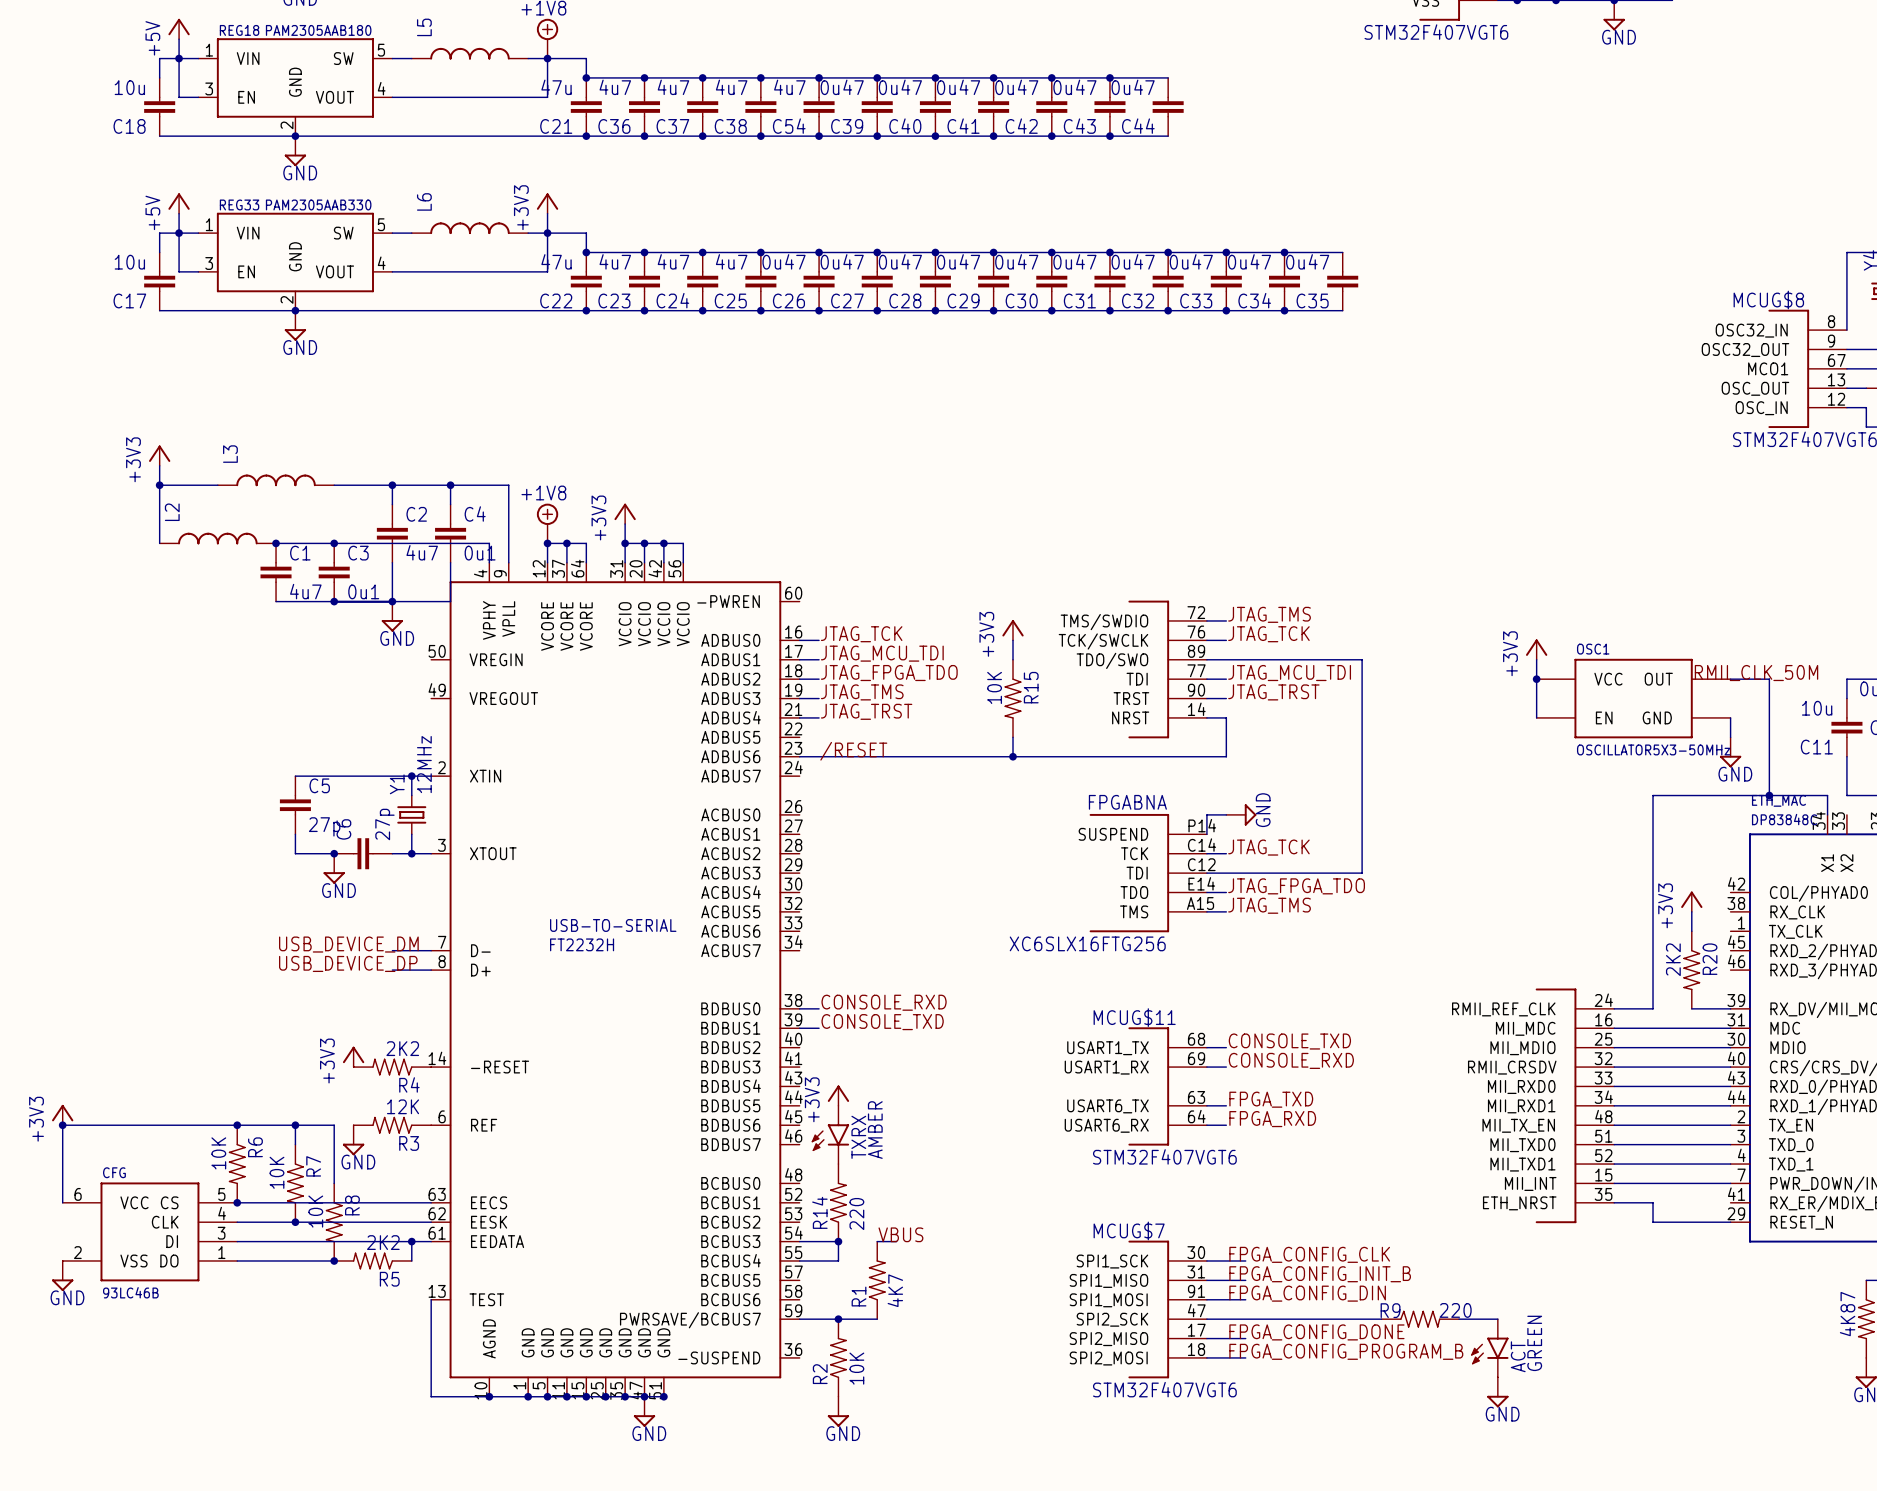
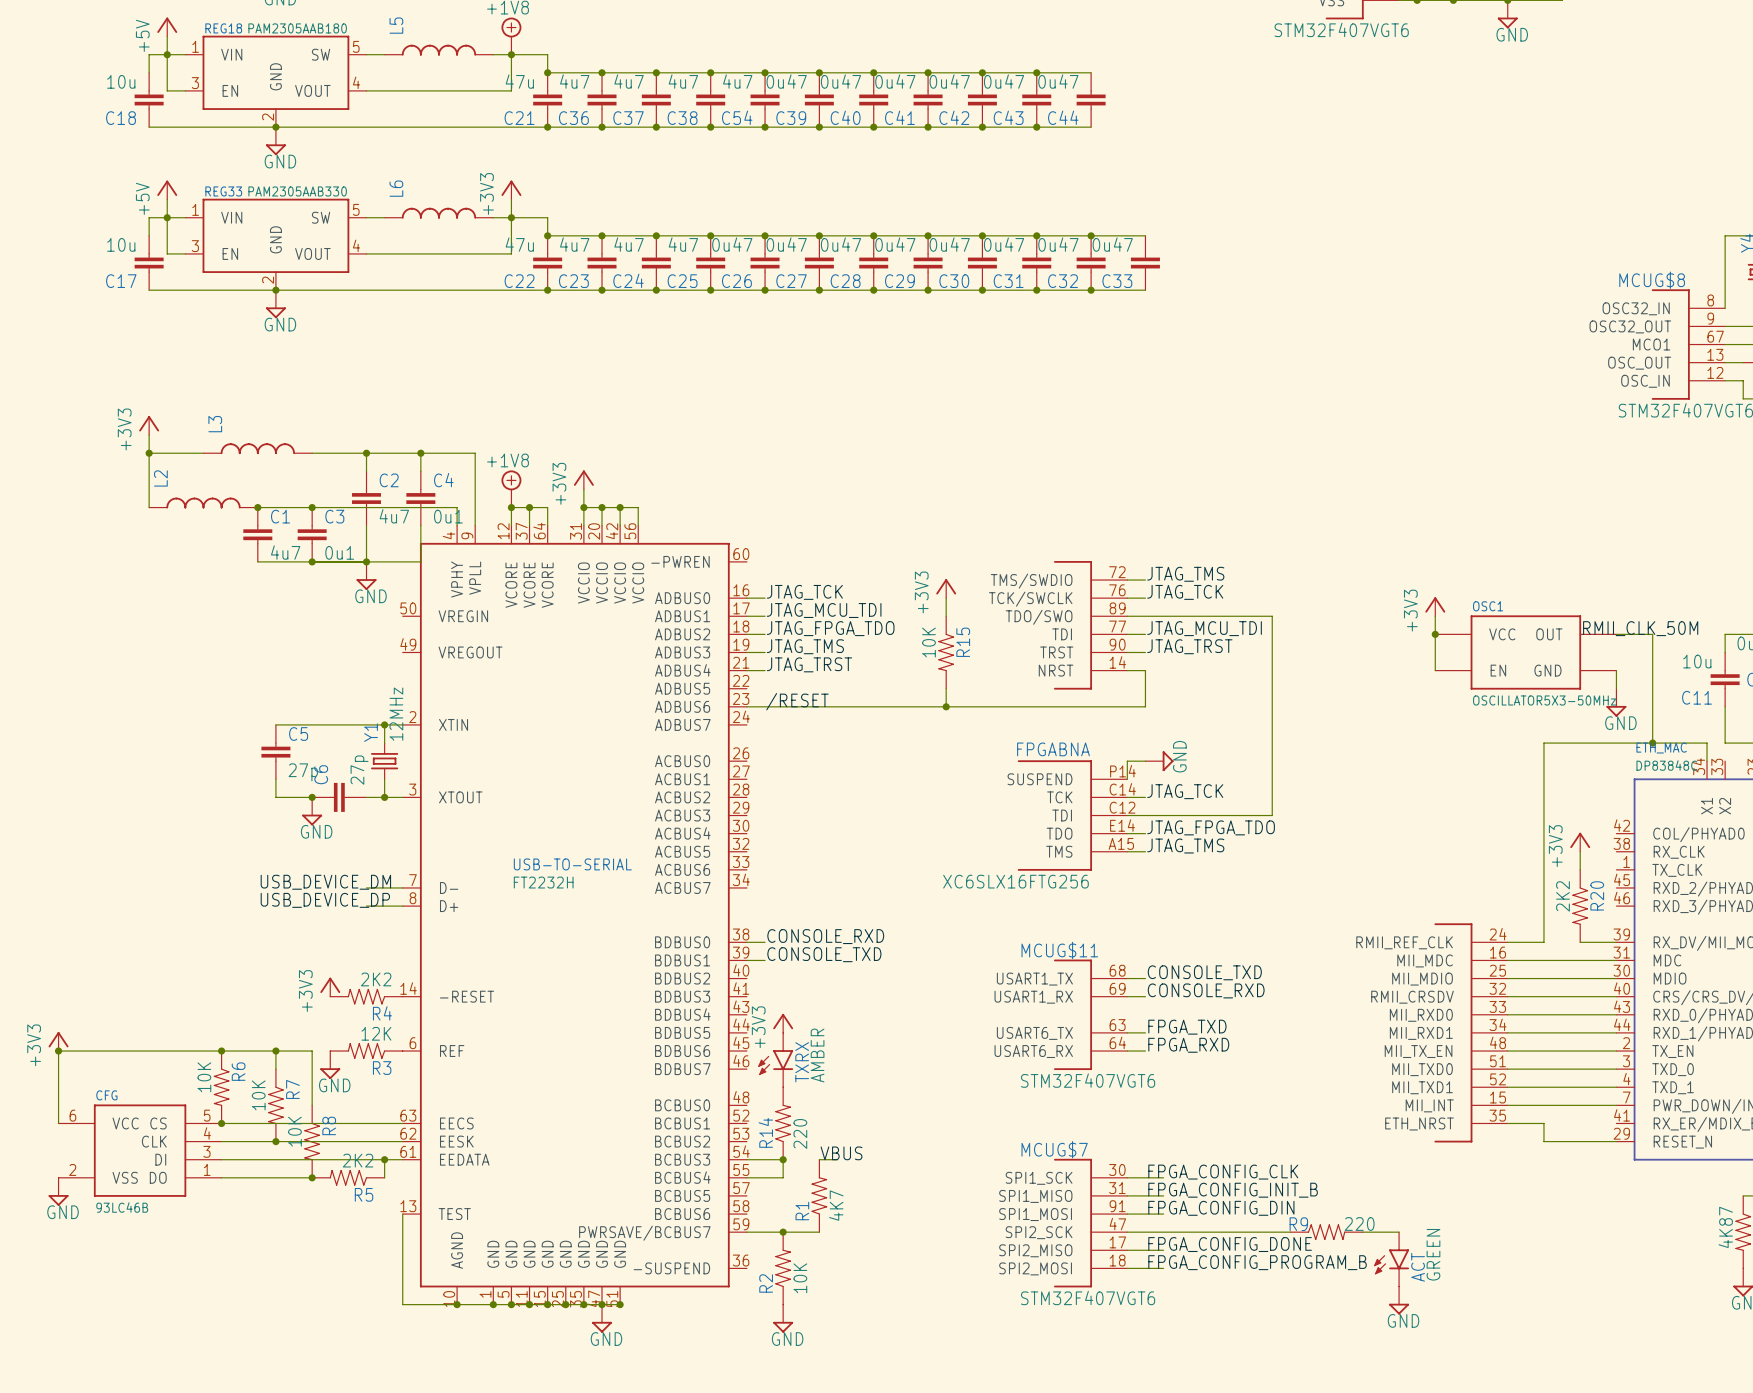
wire: (1226, 252) (1342, 252) -> none
junction: (1226, 252) -> none
junction: (1284, 252) -> none
C34: 0u47 (1284, 281) -> none
C35: 0u47 (1342, 281) -> none
wire: (1226, 310) (1342, 310) -> none
junction: (1226, 310) -> none
junction: (1284, 310) -> none

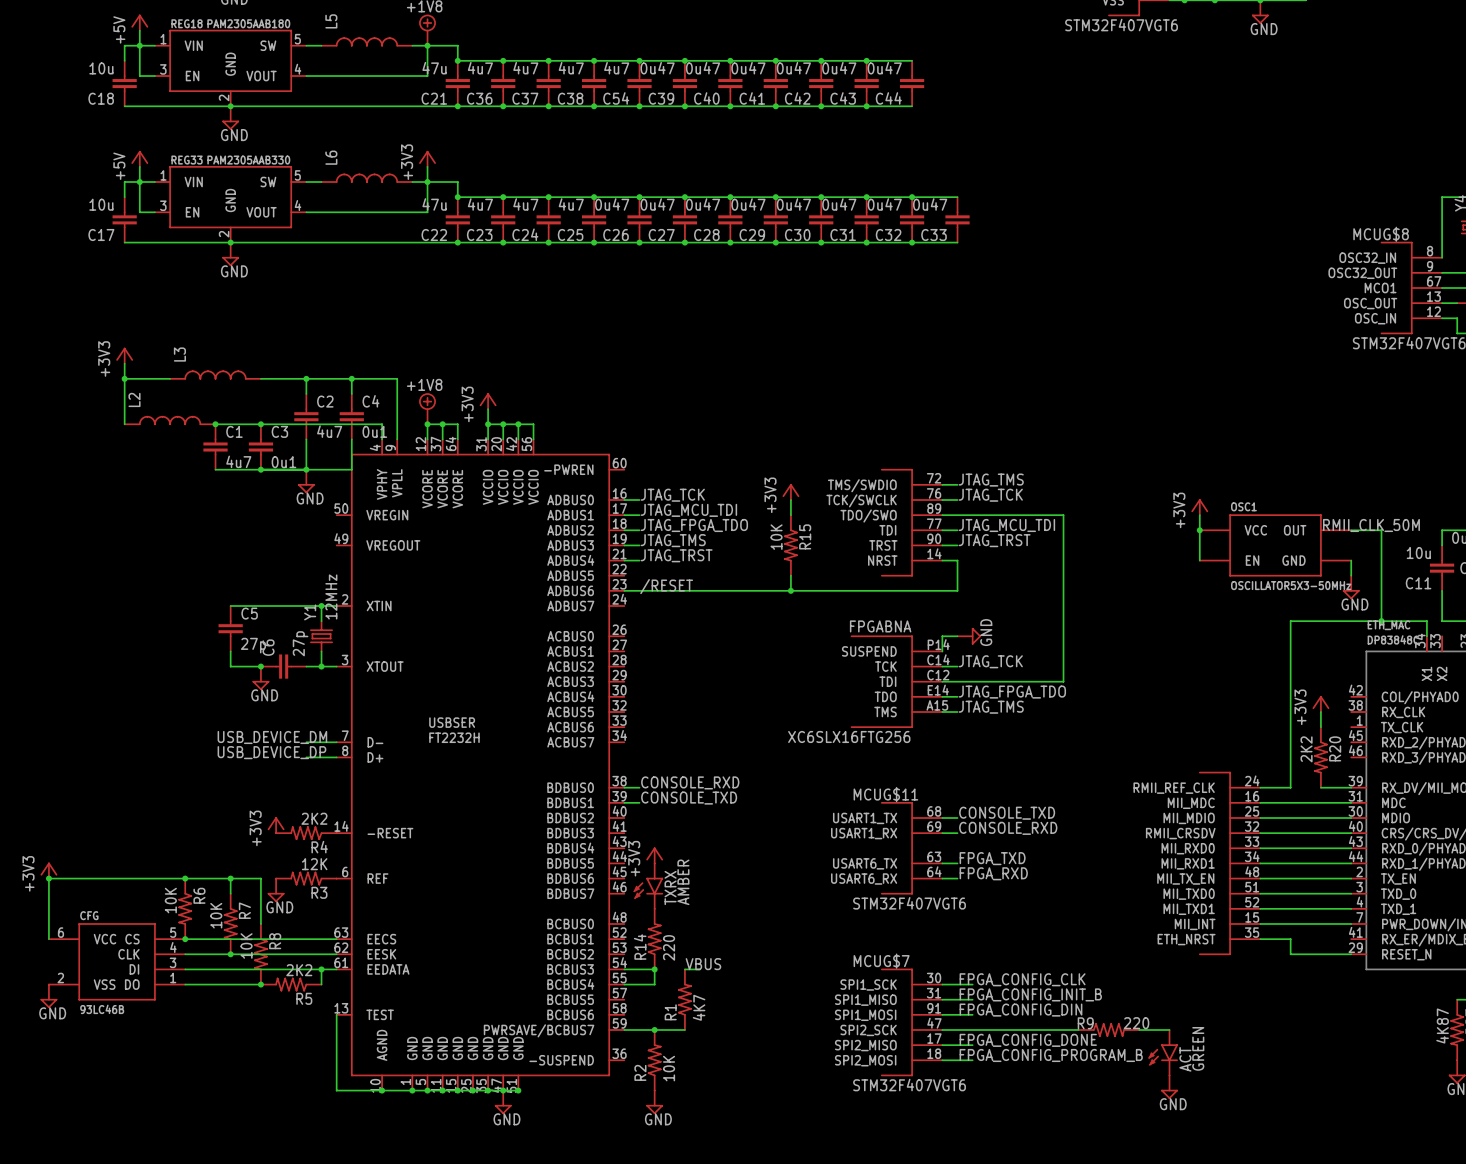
USB-TO-SERIAL name: USB-TO-SERIAL (572, 864) -> USBSER (452, 722)

